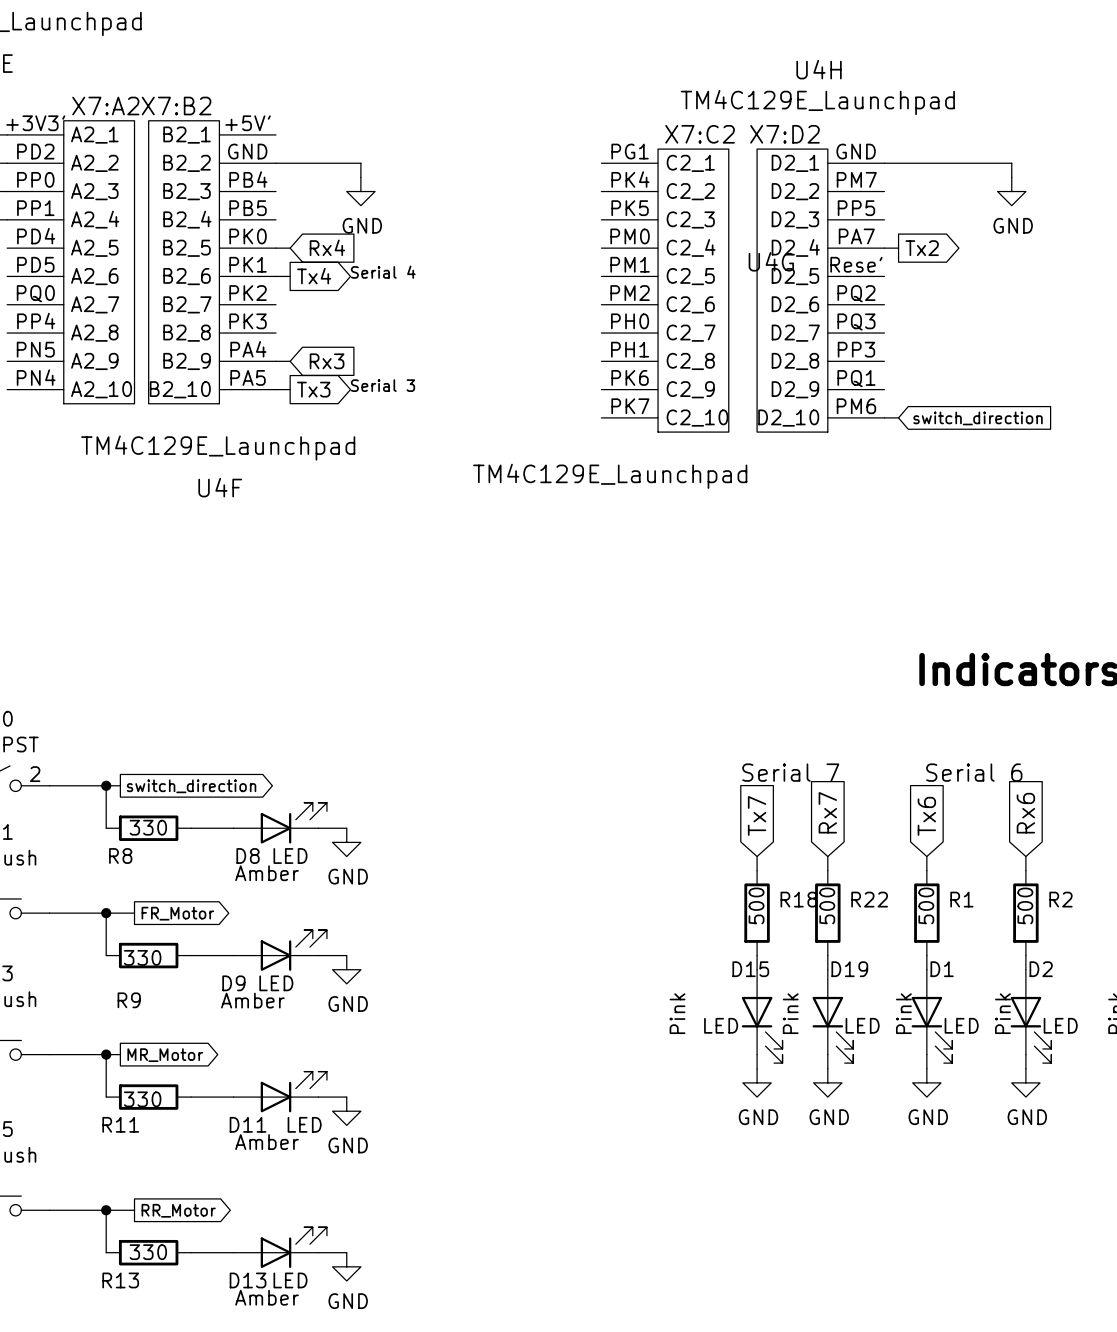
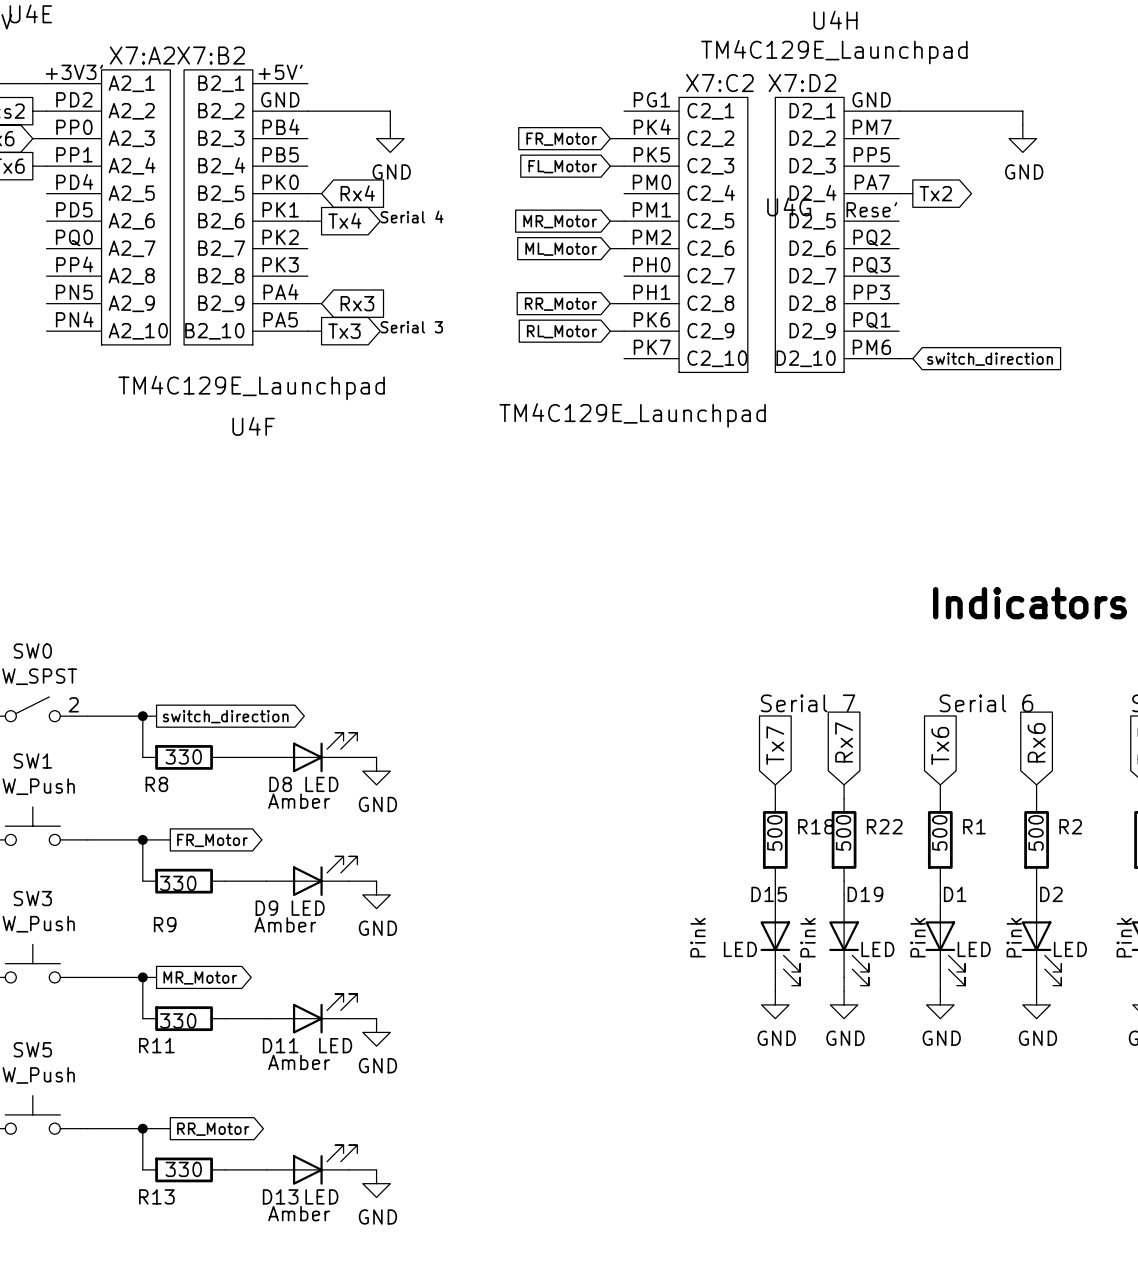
wire: none -> (610, 138) (624, 138)
global label: none -> FR_Motor (561, 139)
wire: none -> (610, 166) (624, 166)
global label: none -> FL_Motor (562, 166)
global label: none -> MR_Motor (560, 221)
wire: none -> (610, 221) (624, 221)
wire: none -> (610, 248) (624, 248)
global label: none -> ML_Motor (561, 249)
global label: none -> RR_Motor (560, 304)
wire: none -> (610, 303) (624, 303)
wire: none -> (610, 331) (624, 331)
global label: none -> RL_Motor (561, 331)

